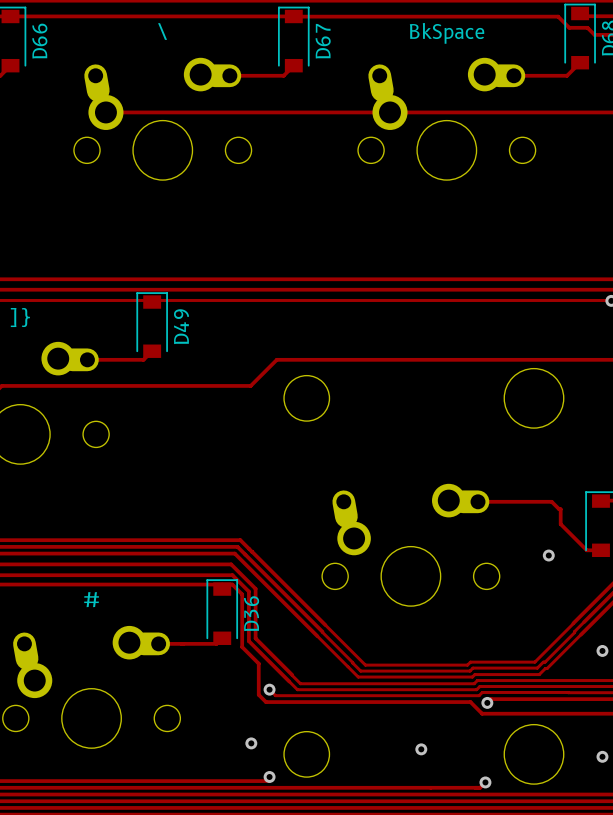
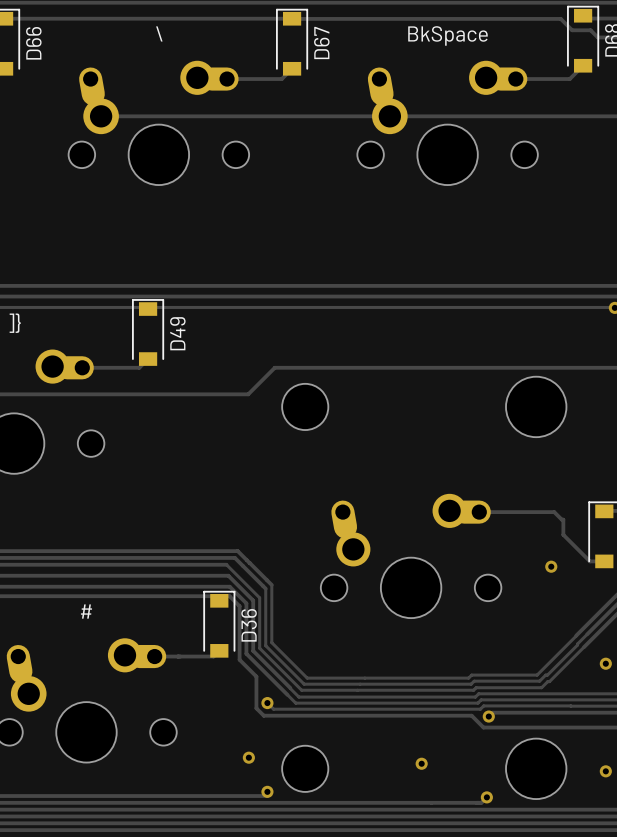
track: (229, 553) (234, 553) (358, 677) -> (226, 564) (259, 597) (259, 648) (301, 690) (357, 690)
track: (273, 573) (365, 665) -> (271, 585) (271, 642) (307, 678) (364, 678)
track: (267, 577) (360, 671) -> (265, 588) (265, 645) (304, 684) (360, 684)

